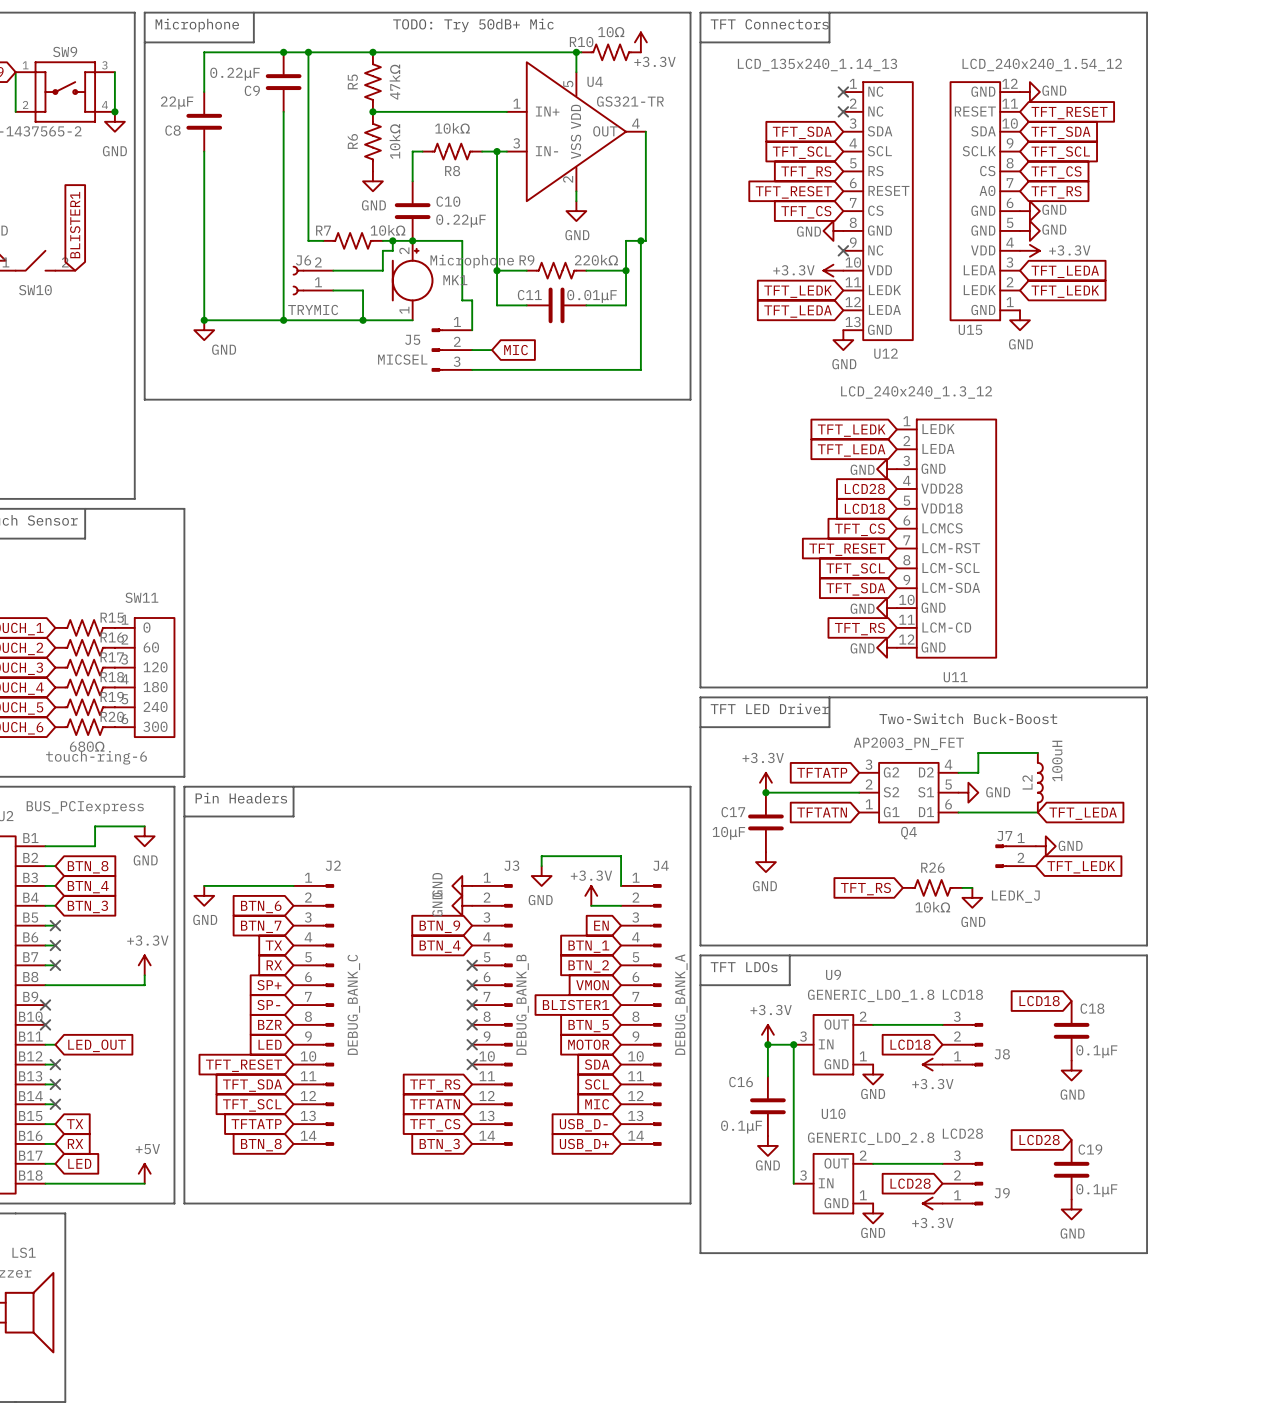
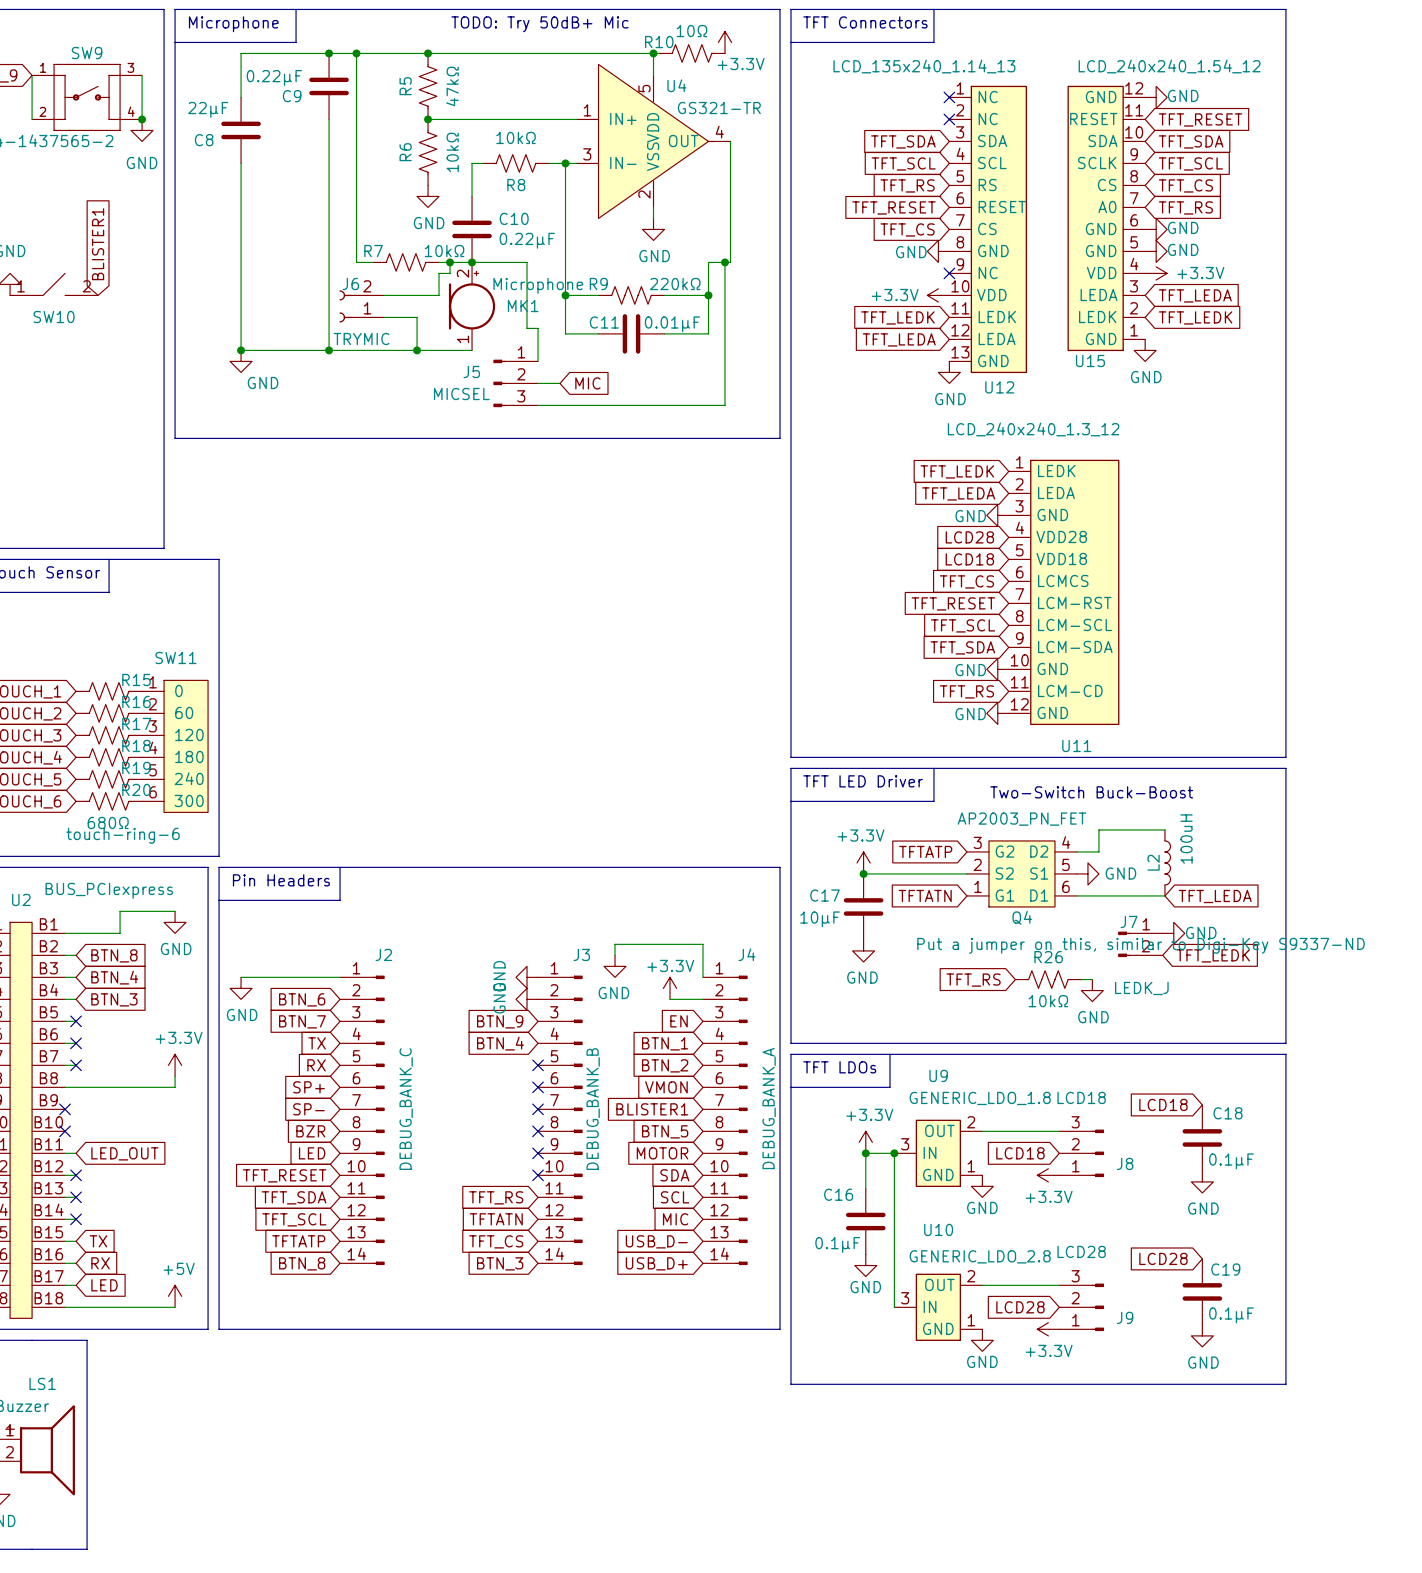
J7 text: none -> Put a jumper on this, similar to Digi-Key S9337-ND (1141, 945)

